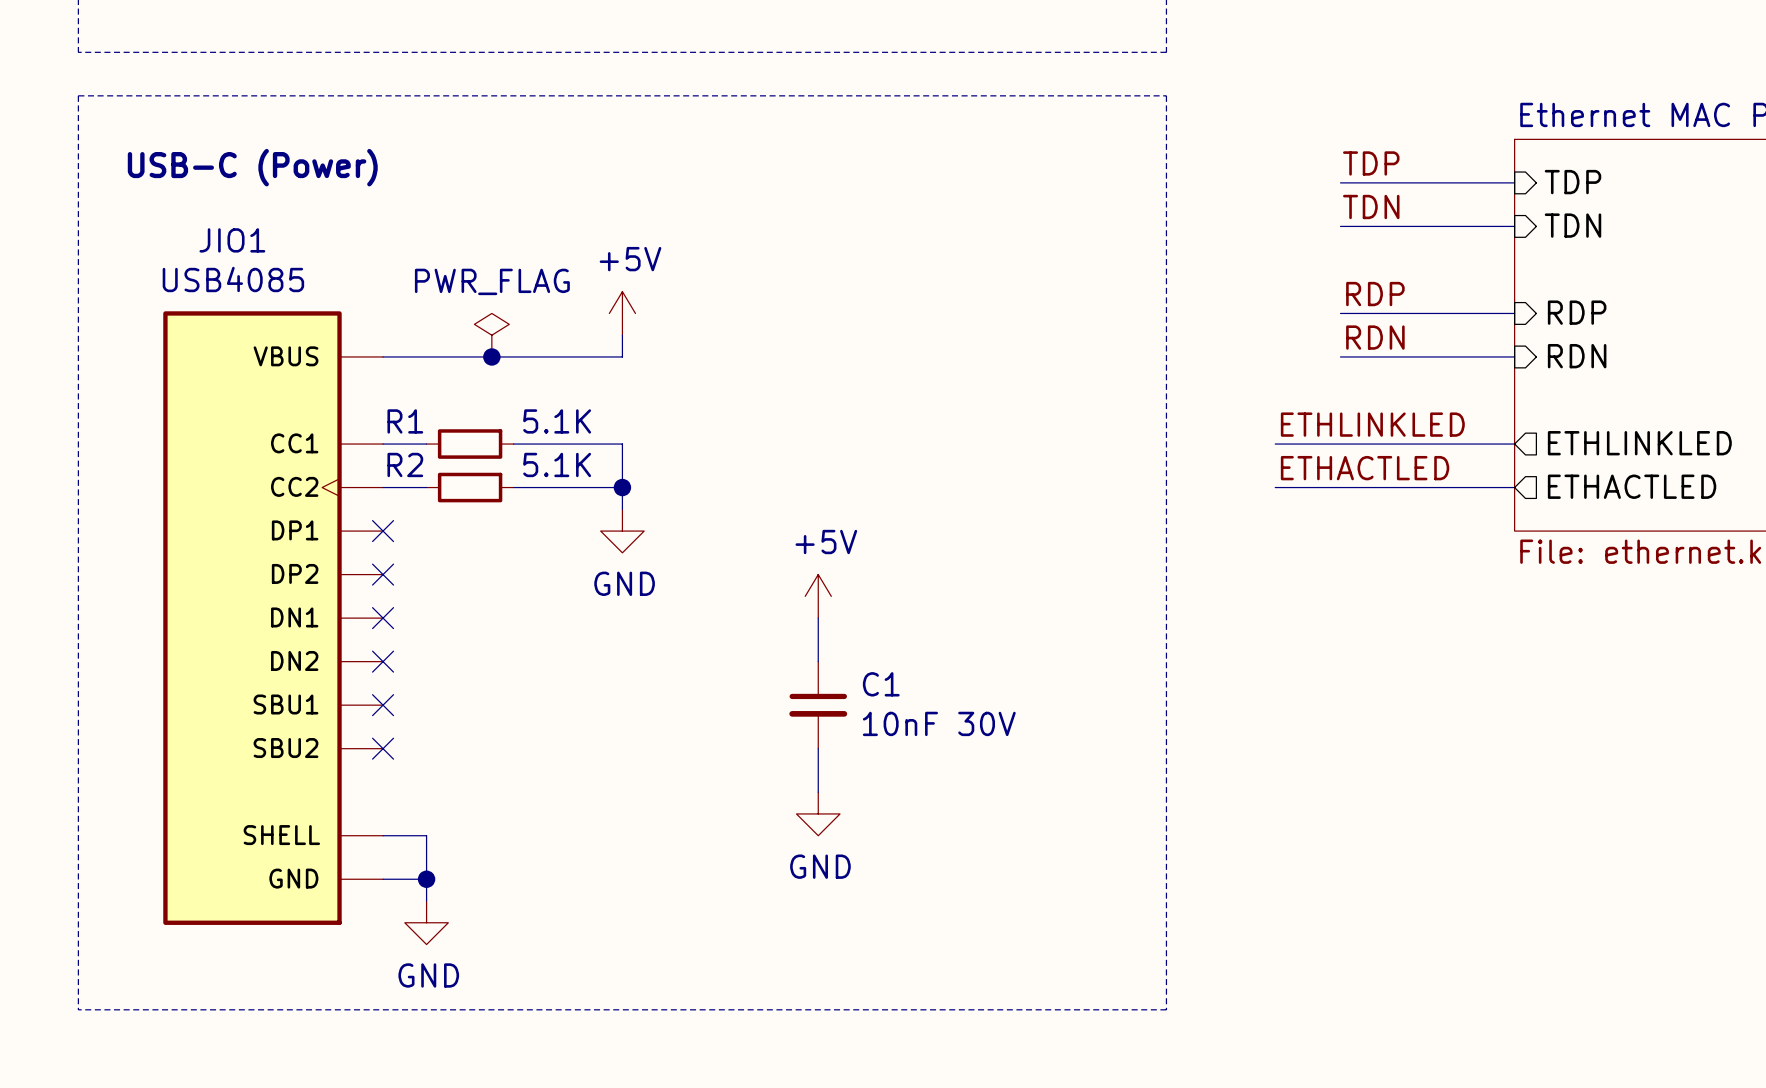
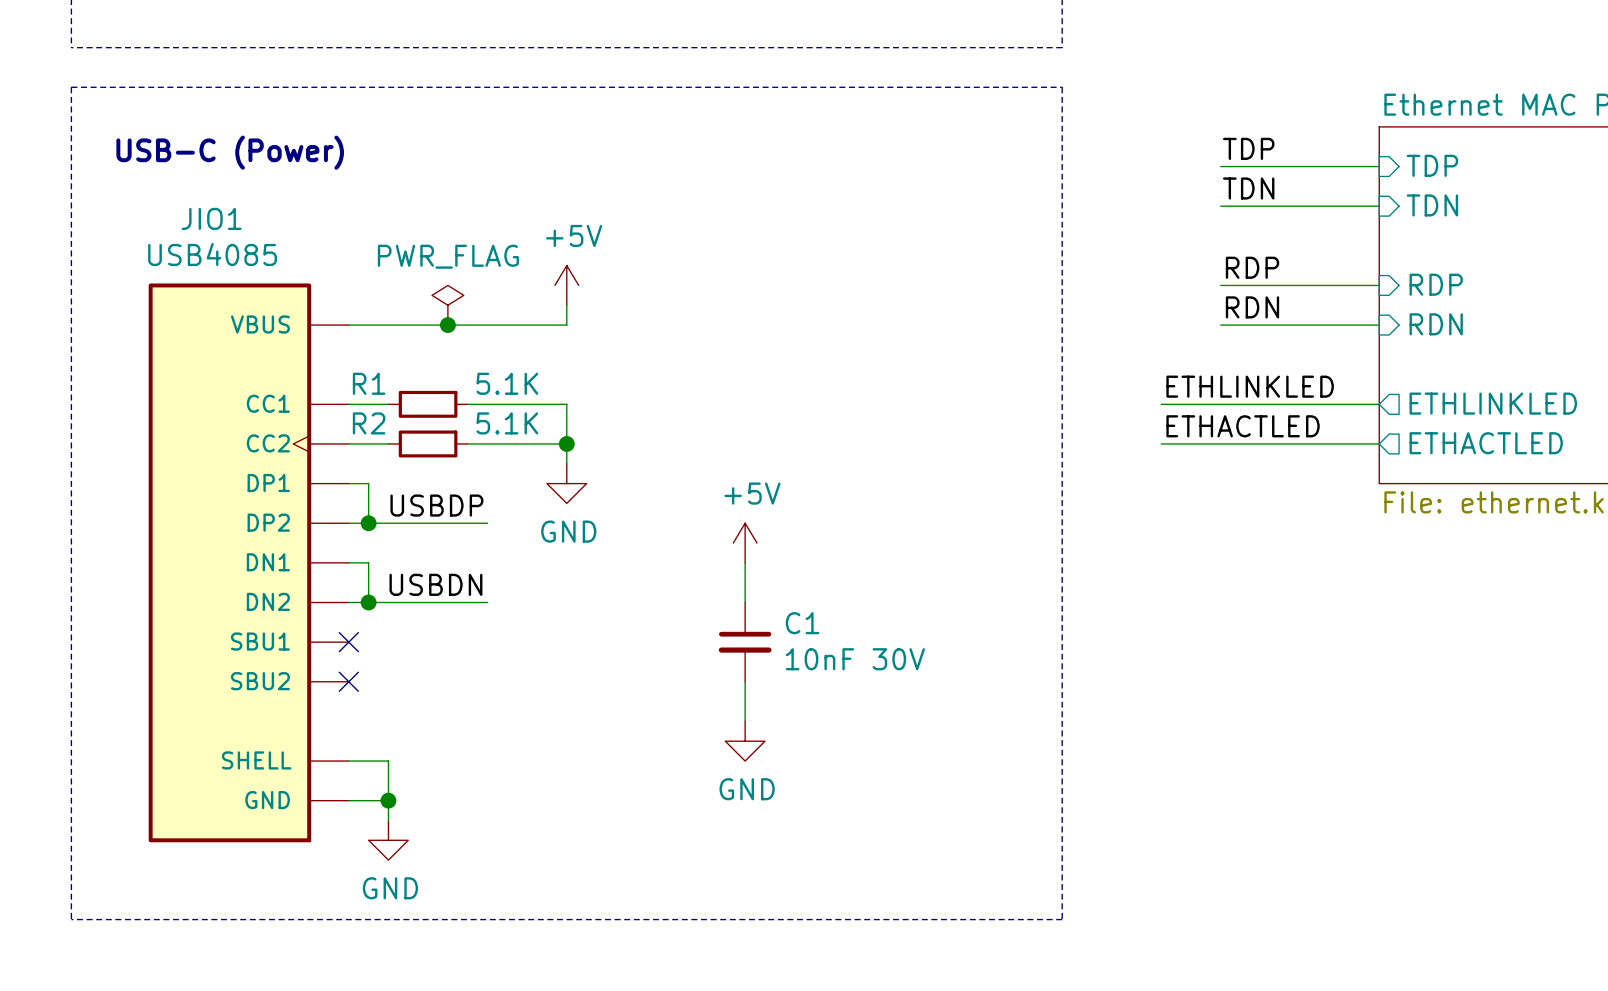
wire: none -> (348, 483) (368, 483) (368, 523)
no-connect mark: (383, 531) -> none
label: none -> USBDP (436, 505)
wire: none -> (348, 523) (487, 523)
no-connect mark: (383, 574) -> none
junction: none -> (368, 523)
wire: none -> (348, 562) (368, 562) (368, 602)
no-connect mark: (383, 618) -> none
label: none -> USBDN (435, 584)
wire: none -> (348, 602) (487, 602)
no-connect mark: (383, 661) -> none
junction: none -> (368, 602)

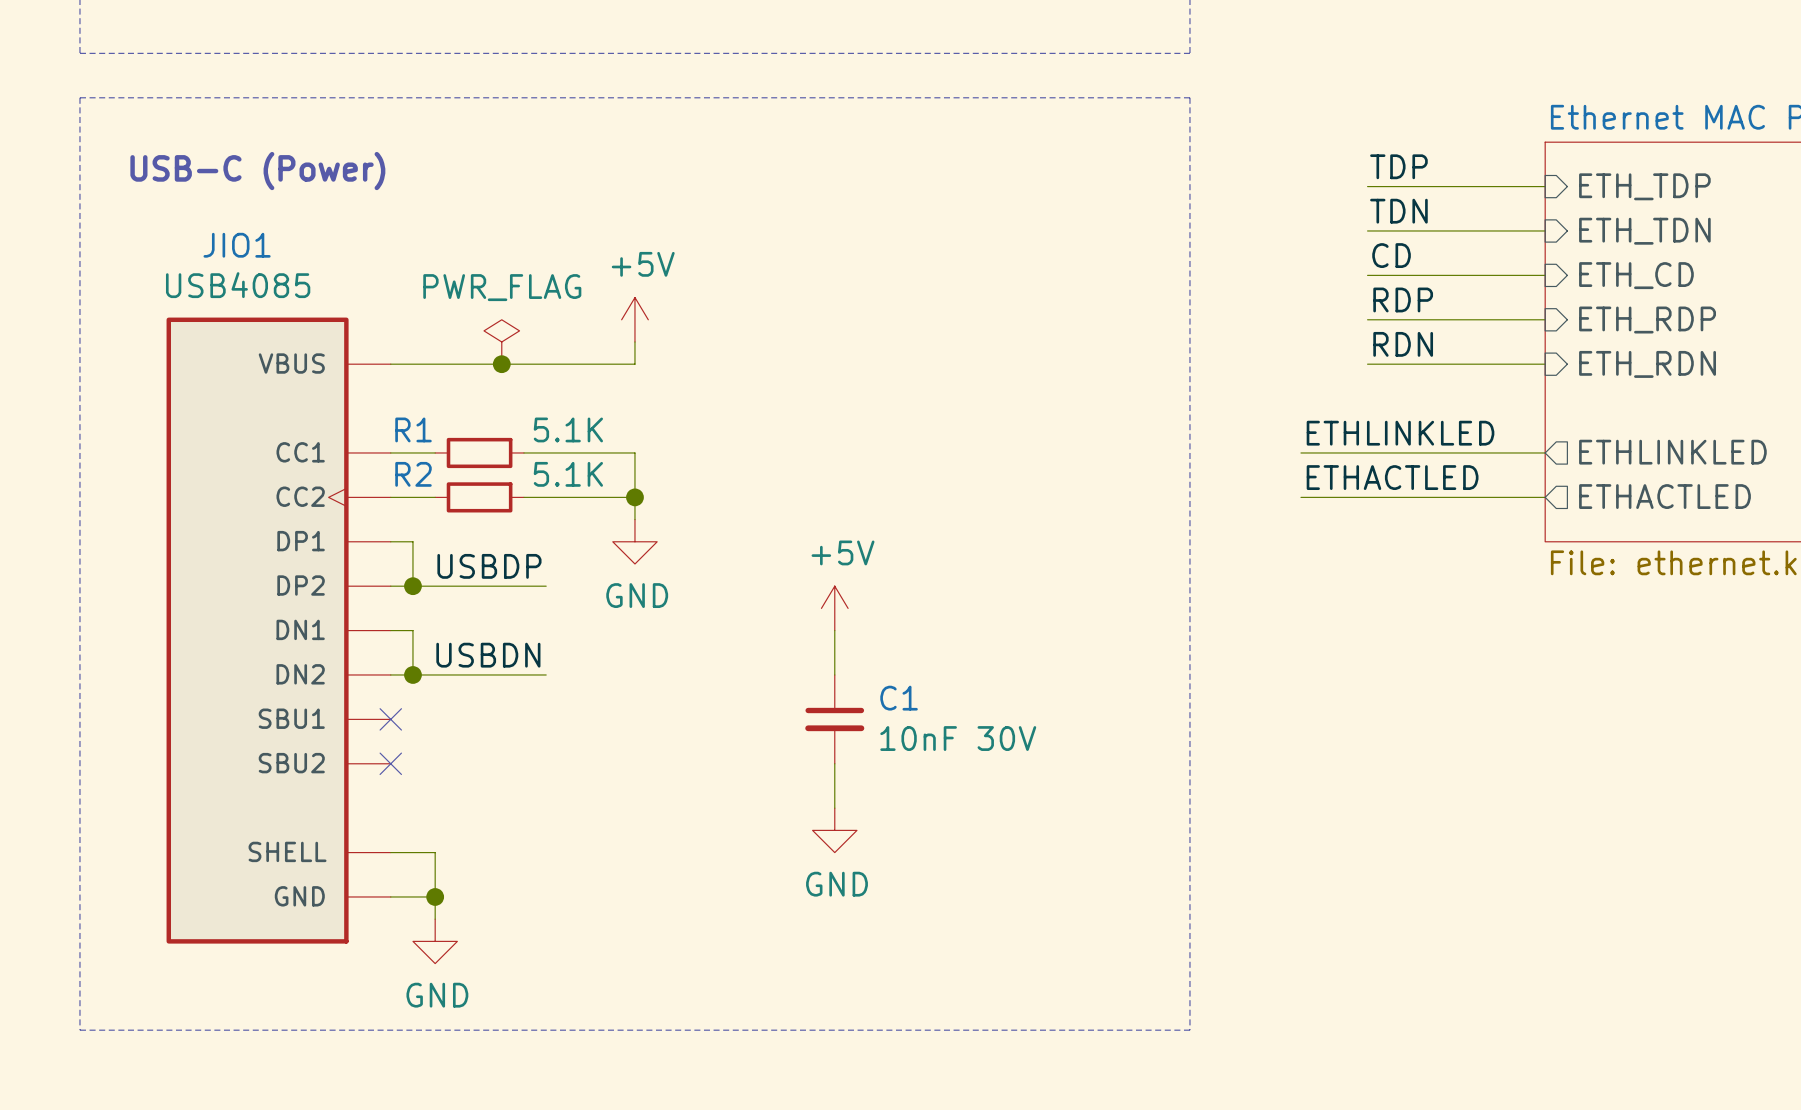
sheet pin: TDP (1432, 165) -> ETH_TDP (1644, 186)
sheet pin: TDN (1432, 205) -> ETH_TDN (1644, 231)
label: none -> CD (1391, 255)
wire: none -> (1367, 275) (1545, 275)
sheet pin: none -> ETH_CD (1636, 275)
sheet pin: RDP (1436, 284) -> ETH_RDP (1647, 320)
sheet pin: RDN (1436, 324) -> ETH_RDN (1647, 364)

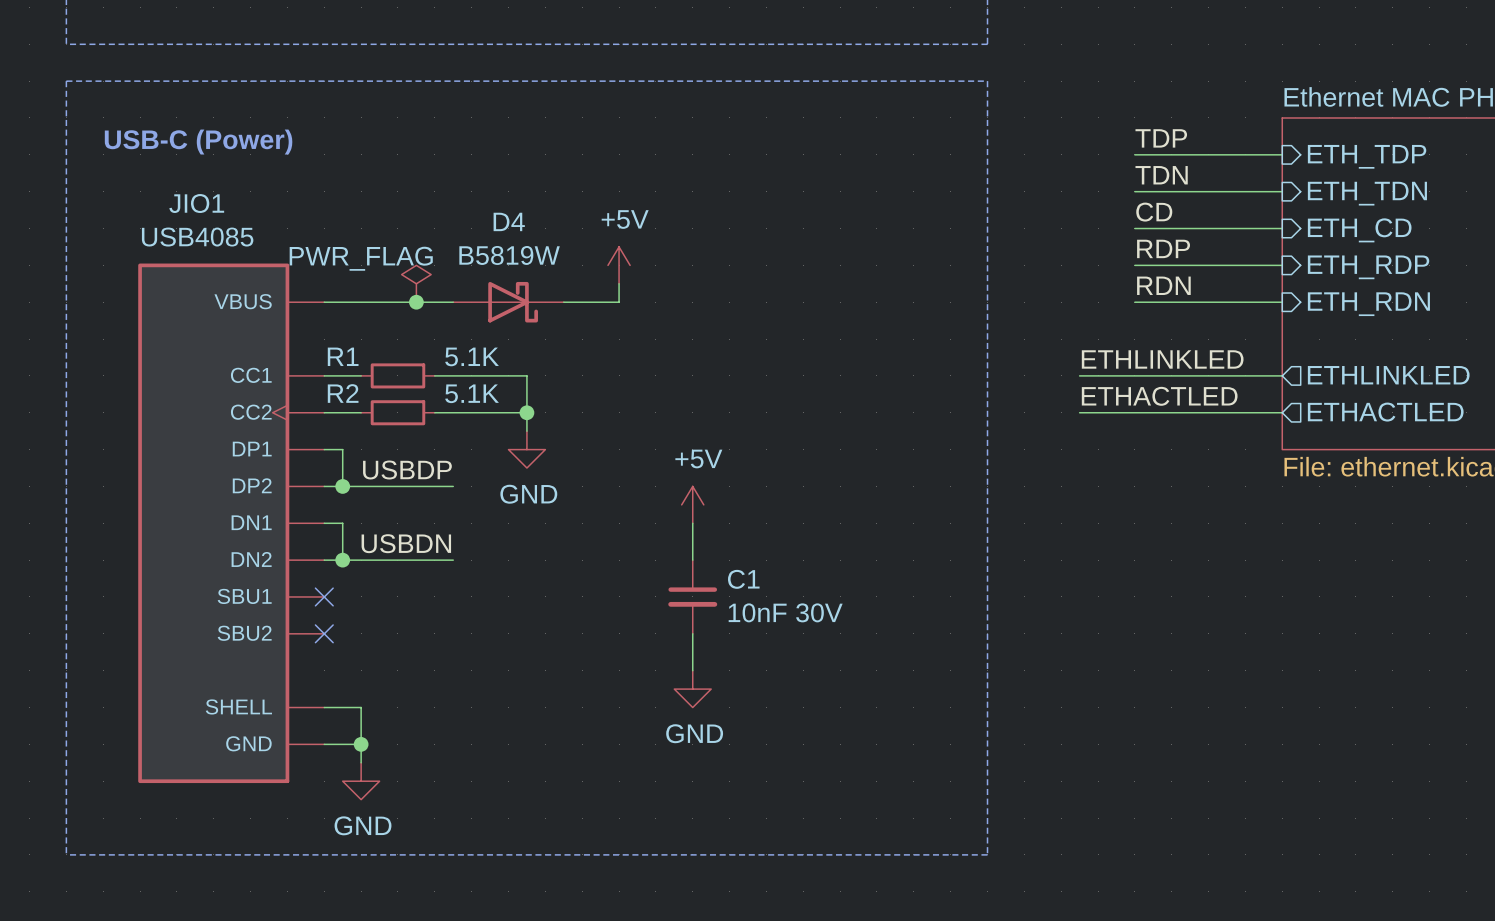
power symbol text position: PWR_FLAG (502, 287) -> PWR_FLAG (361, 258)
power symbol position: +5V (634, 319) -> +5V (619, 265)
wire: none -> (619, 283) (619, 302) (563, 302)
D4: none -> B5819W (508, 302)

